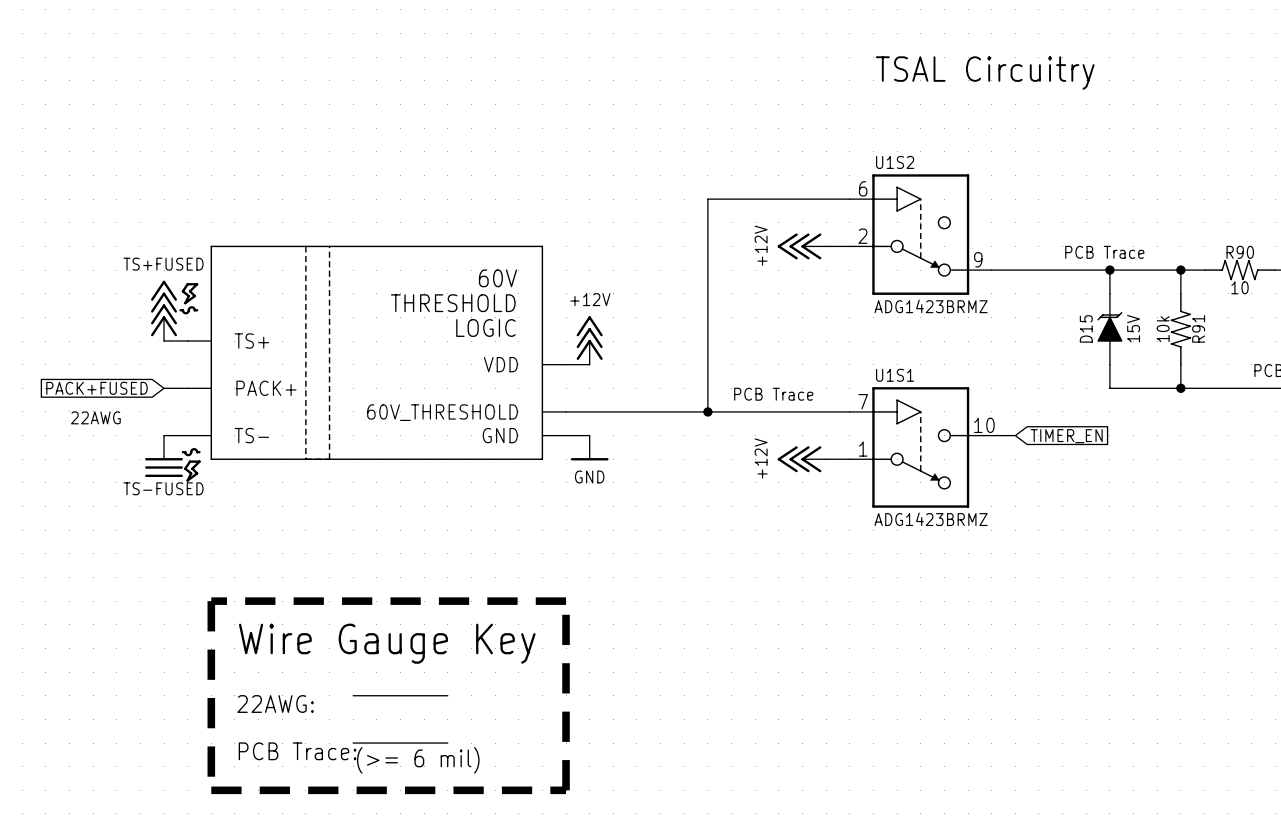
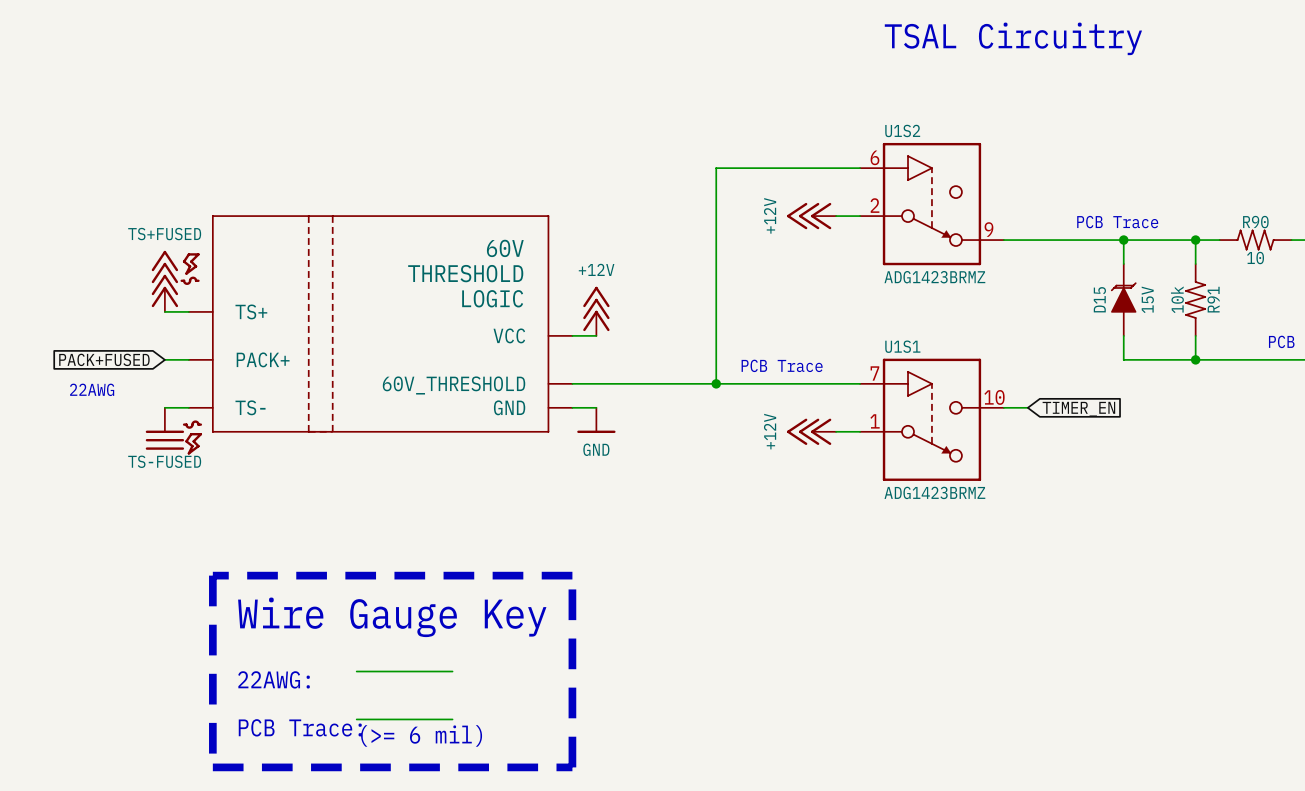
part pin name: VDD (500, 364) -> VCC (509, 335)

